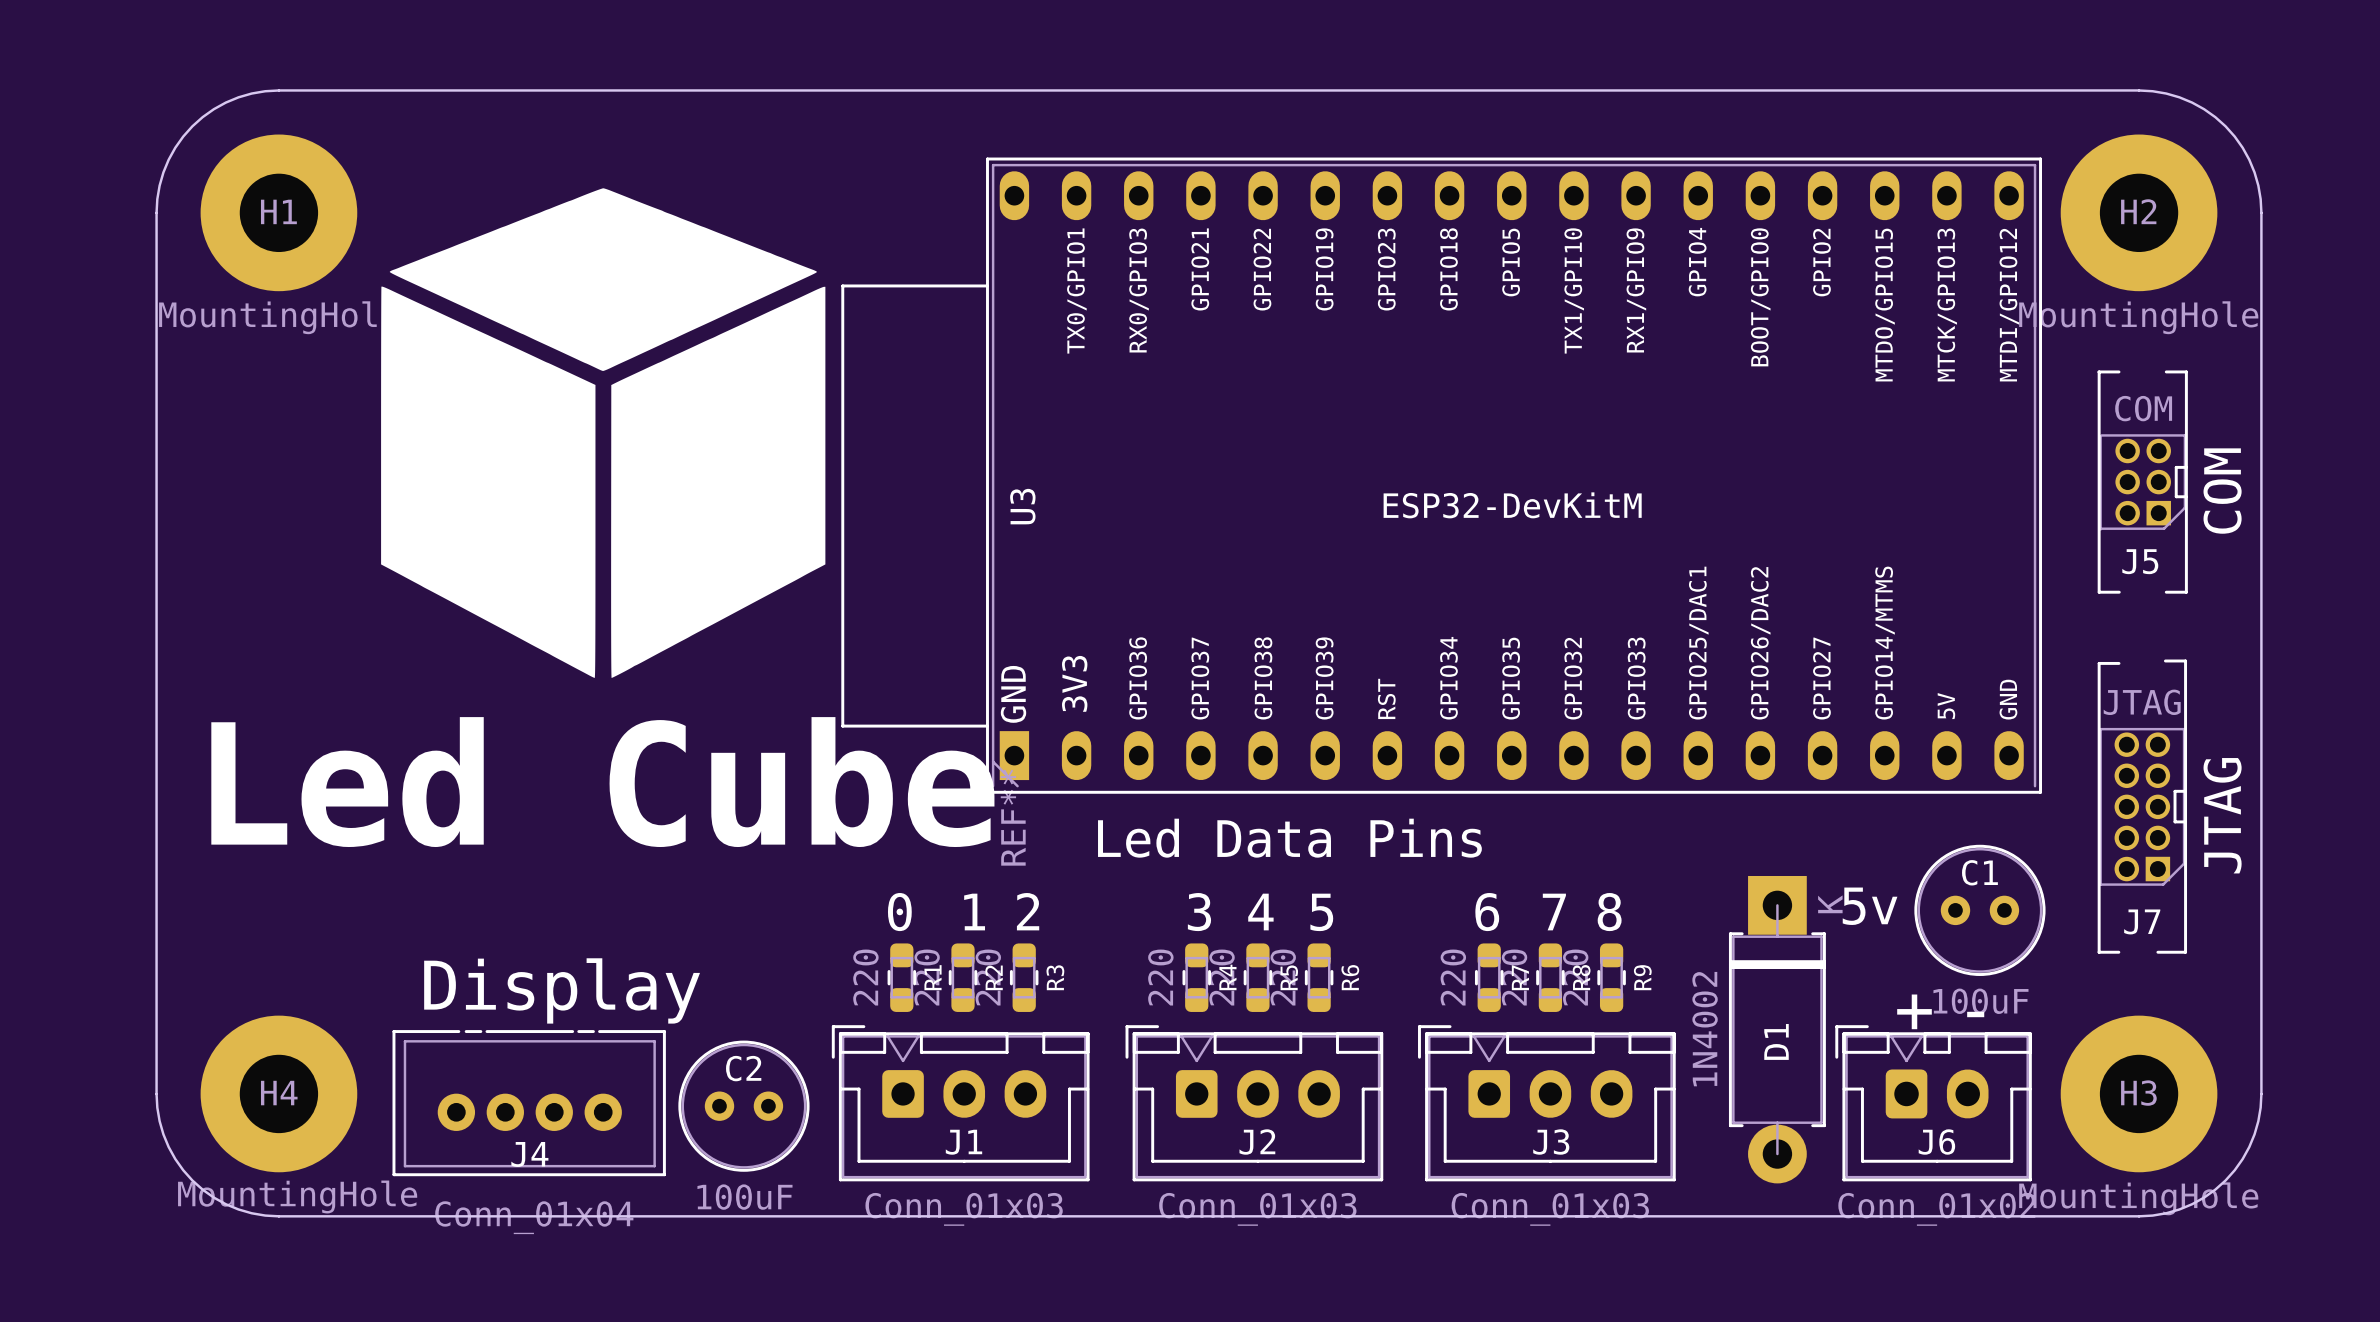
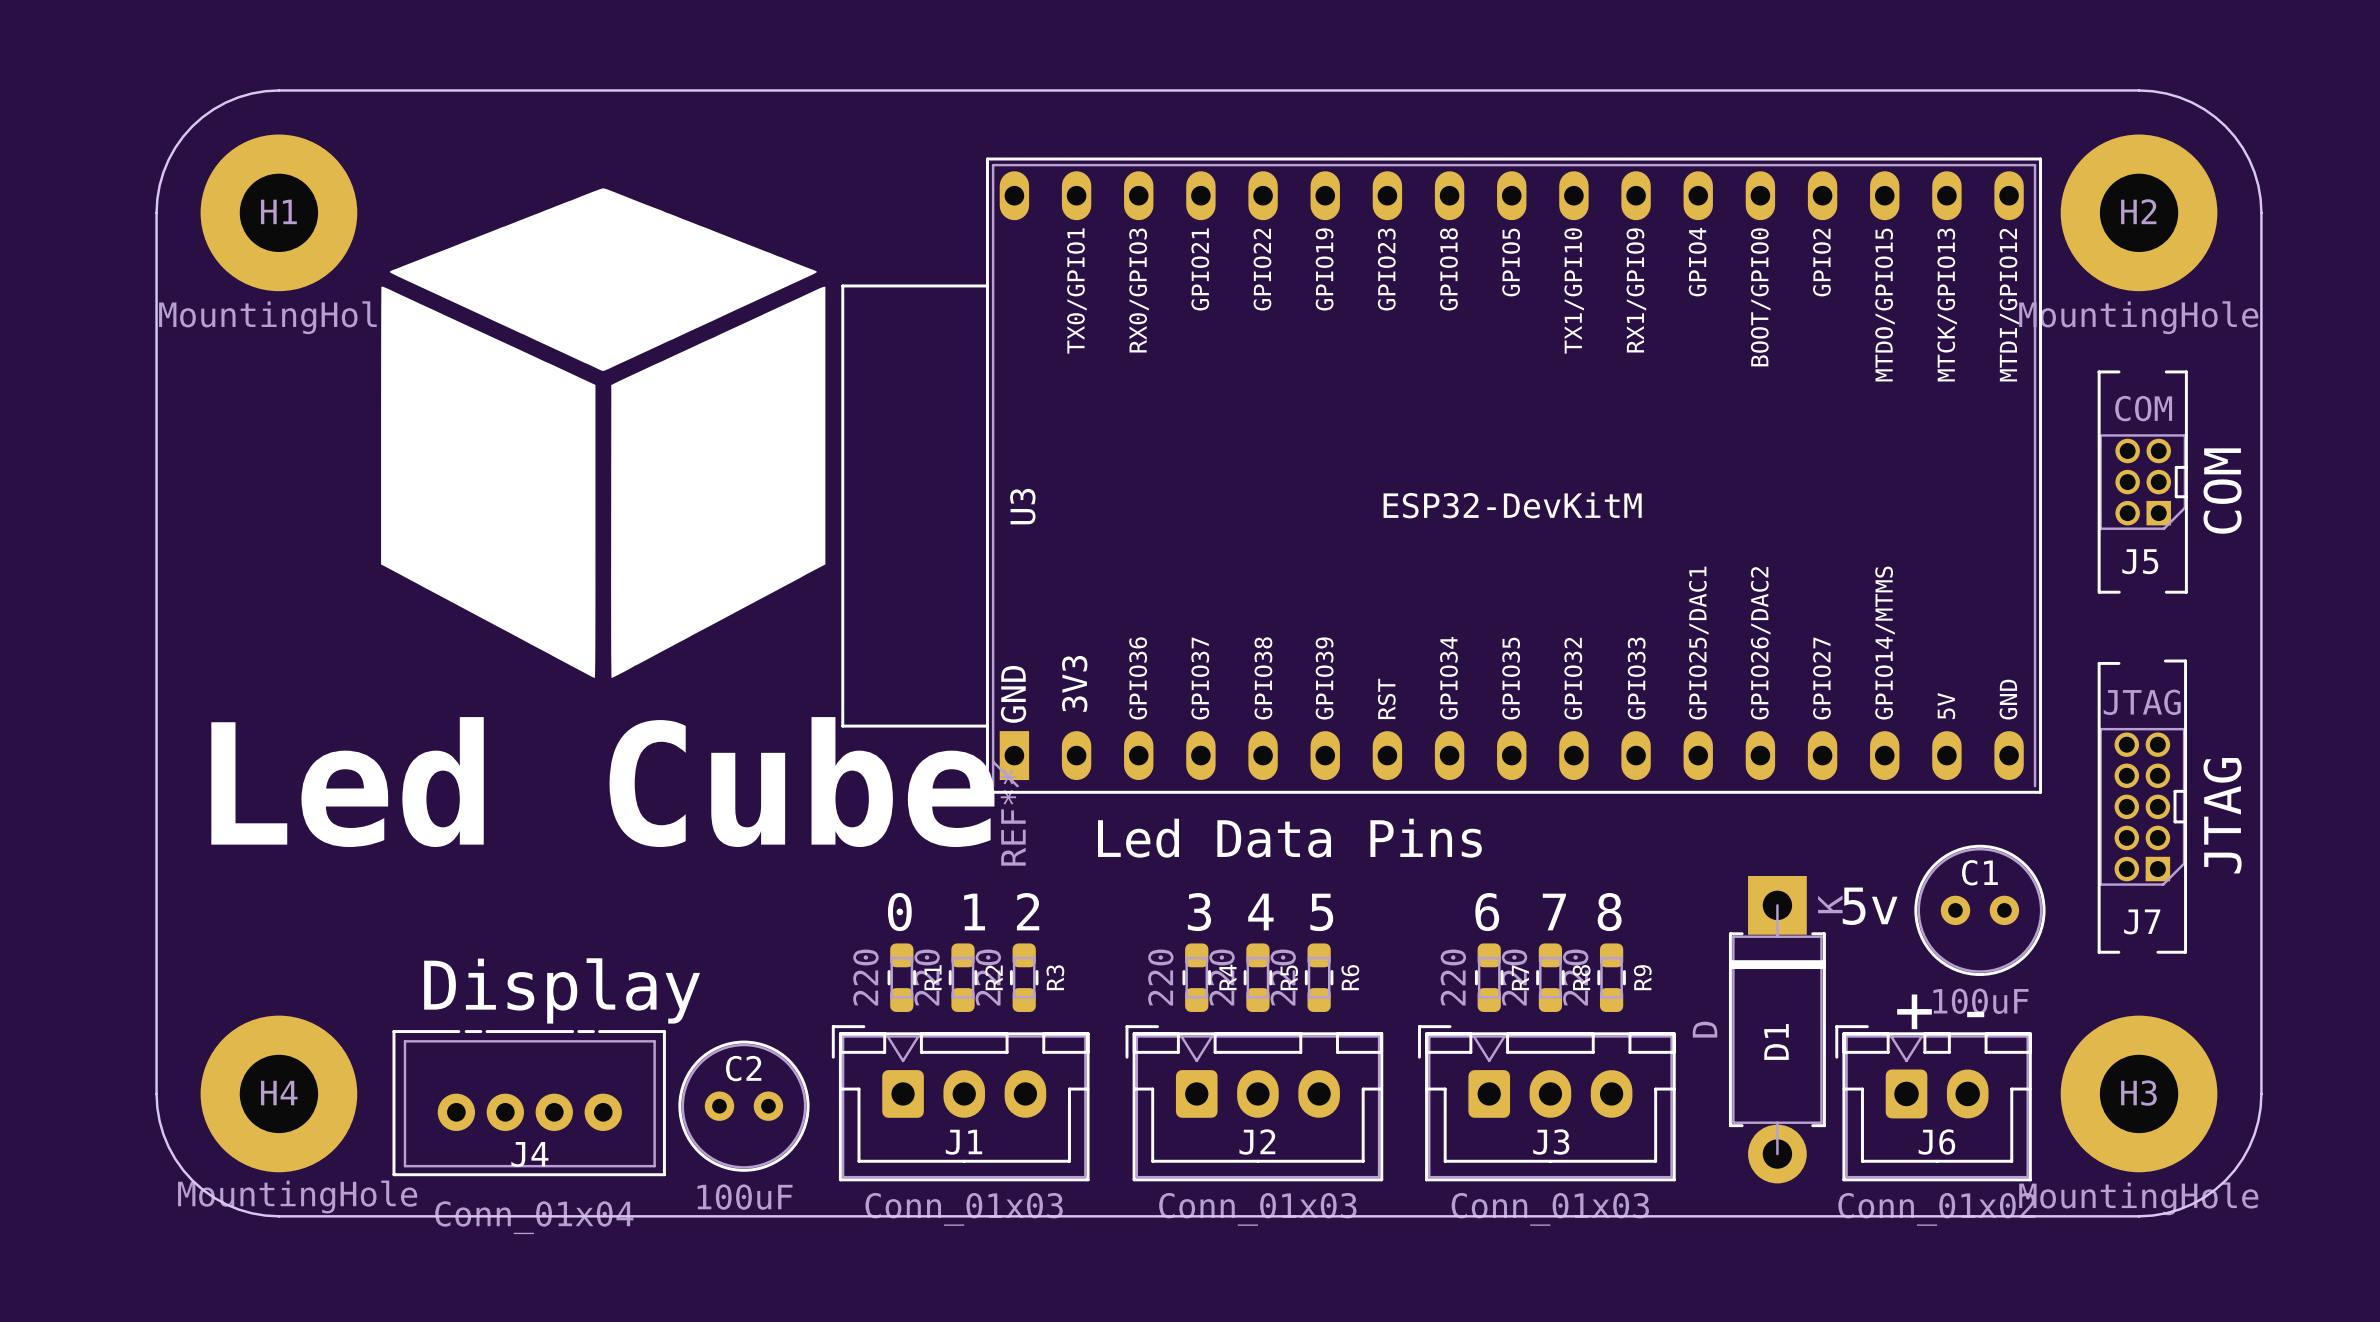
D1 value: 1N4002 (1705, 1029) -> D (1705, 1029)

